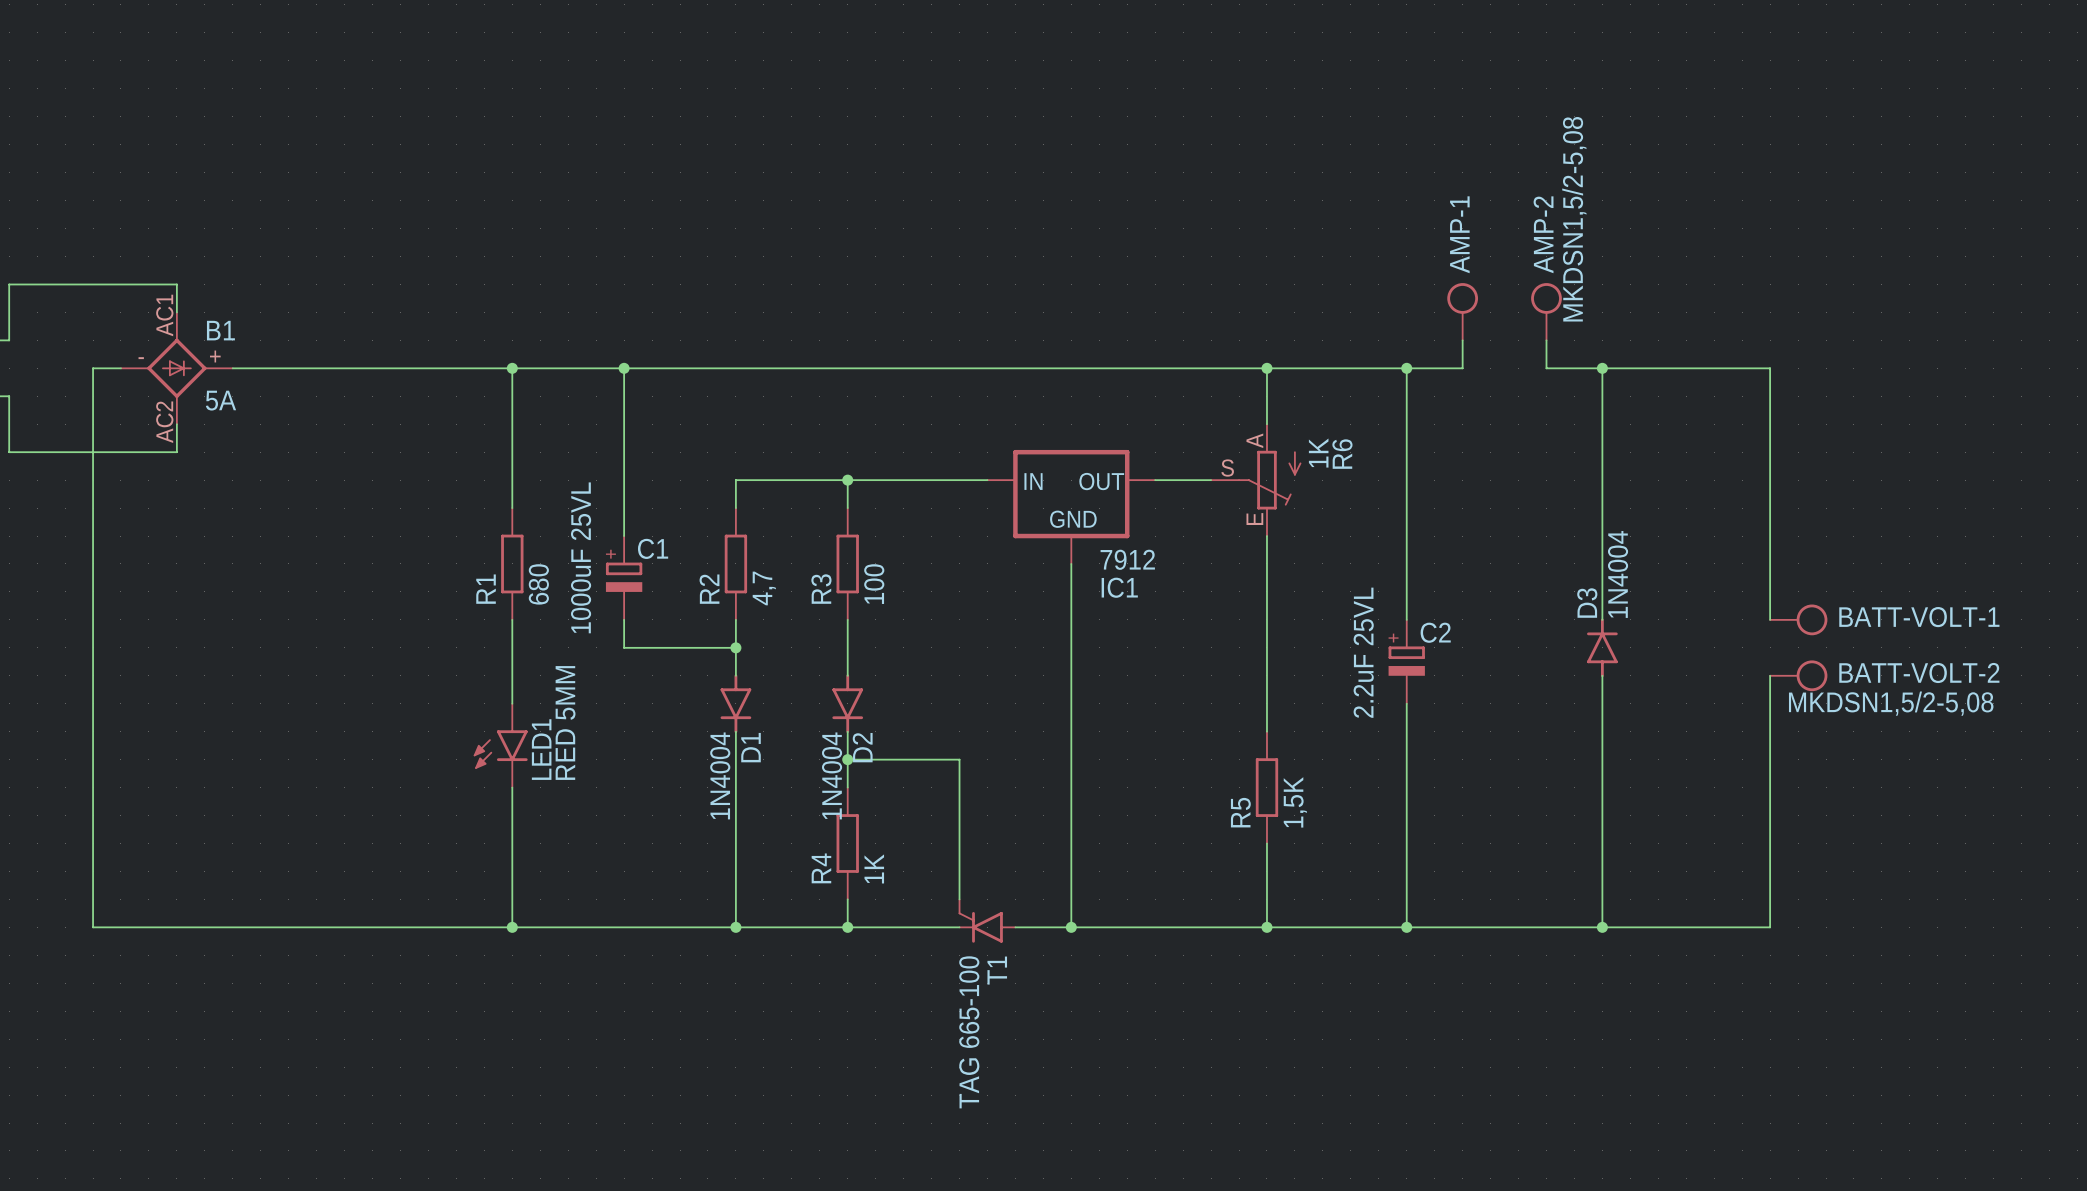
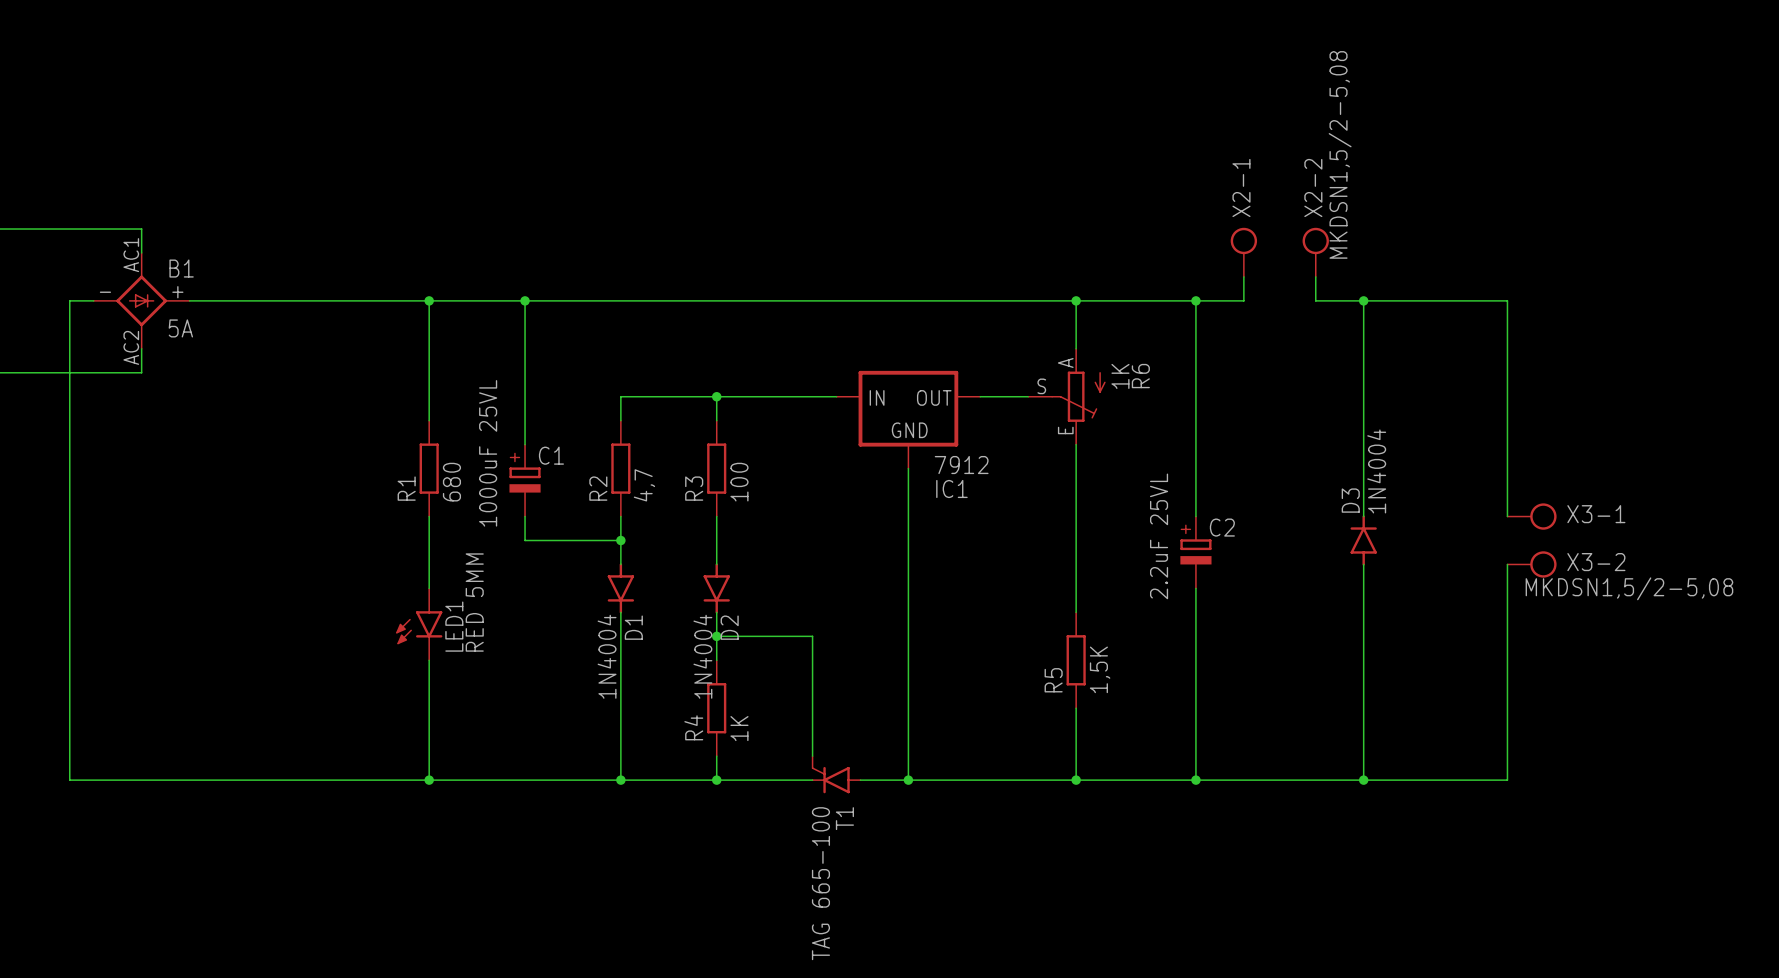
AMP-1 name: AMP-1 (1459, 234) -> X2-1 (1241, 187)
AMP-2 name: AMP-2 (1543, 234) -> X2-2 (1313, 187)
BATT-VOLT-1 name: BATT-VOLT-1 (1919, 617) -> X3-1 (1596, 514)
BATT-VOLT-2 name: BATT-VOLT-2 (1919, 672) -> X3-2 (1596, 562)

